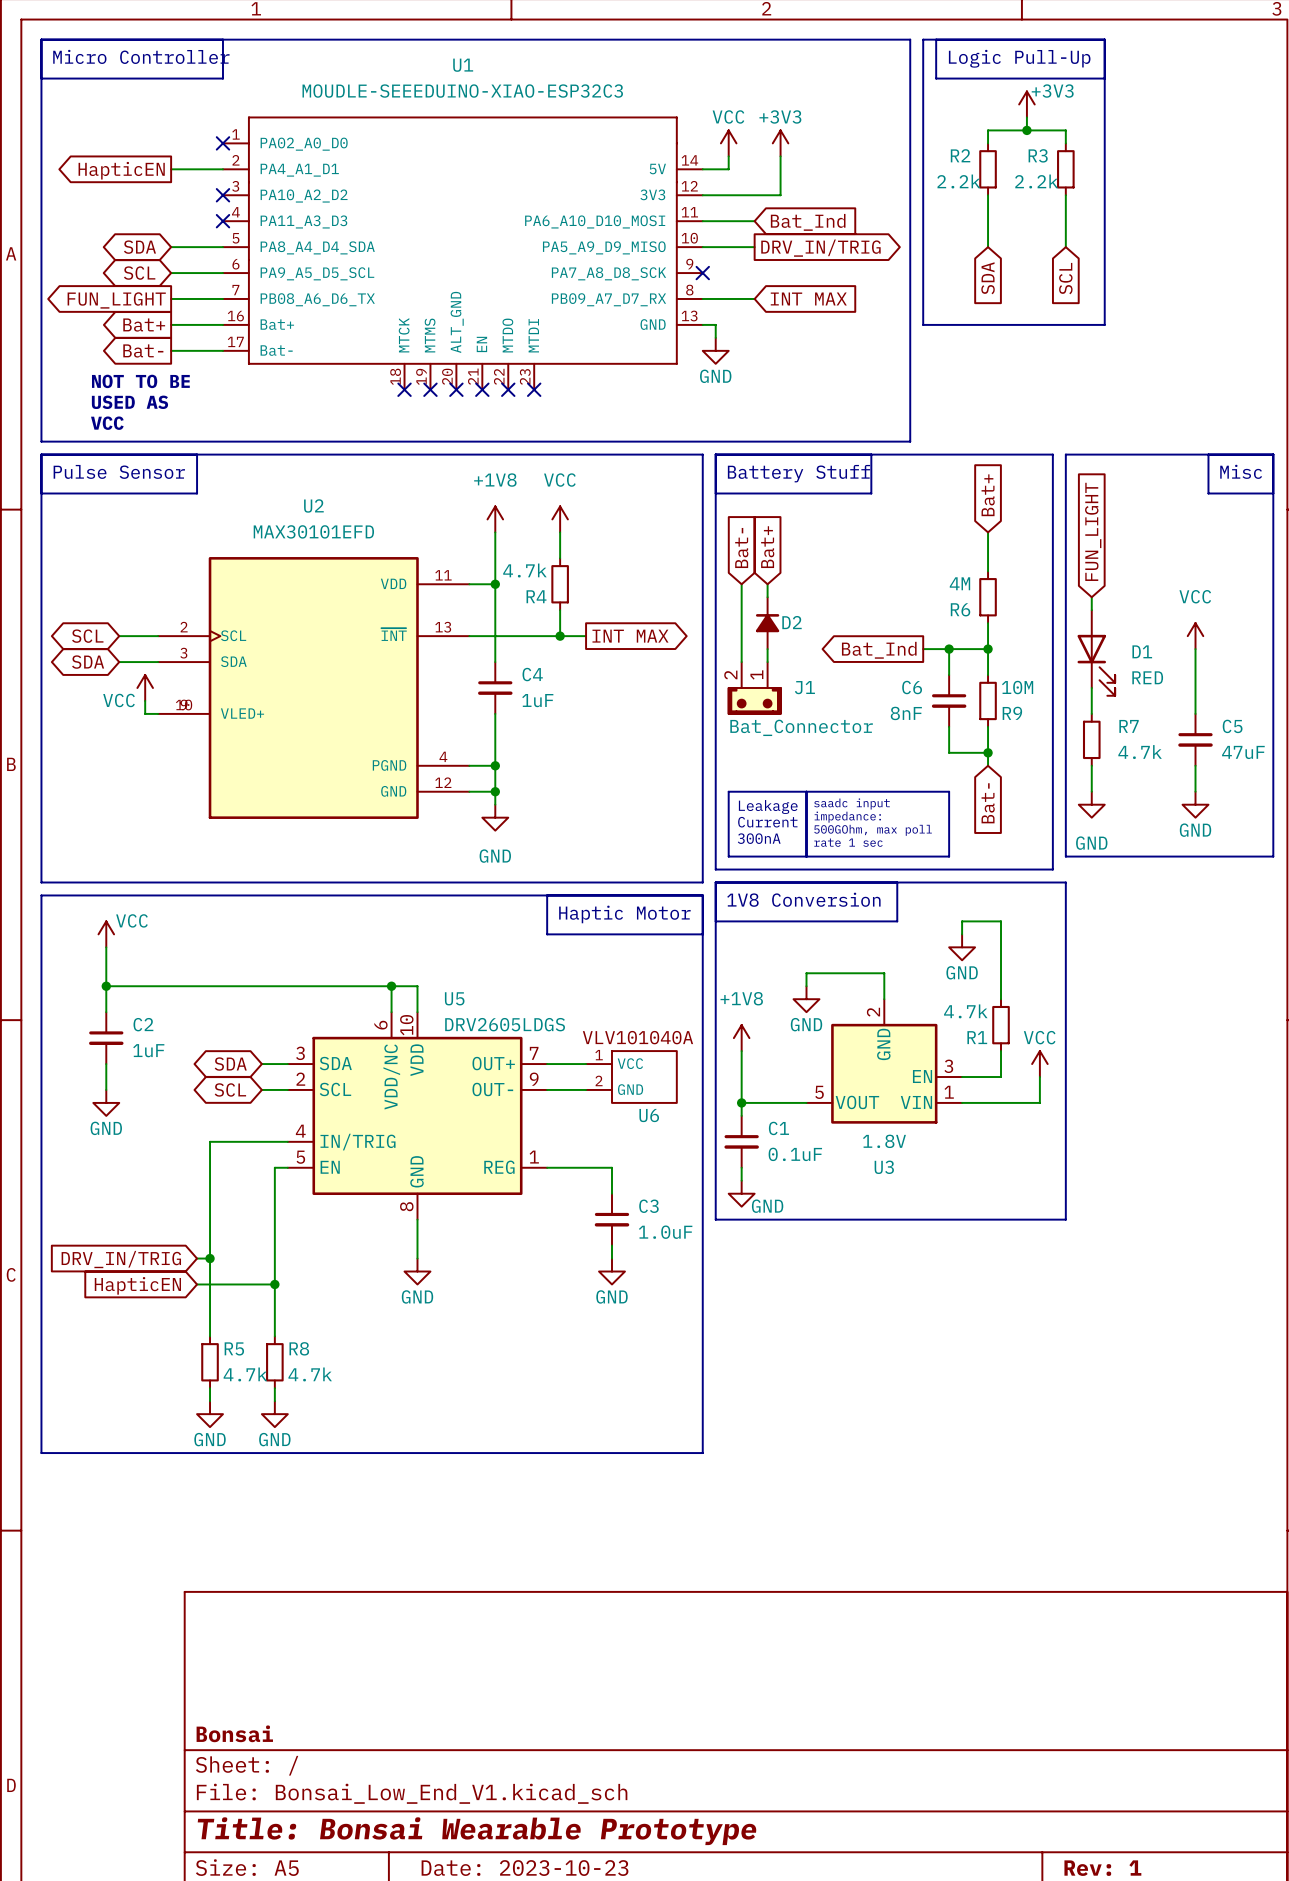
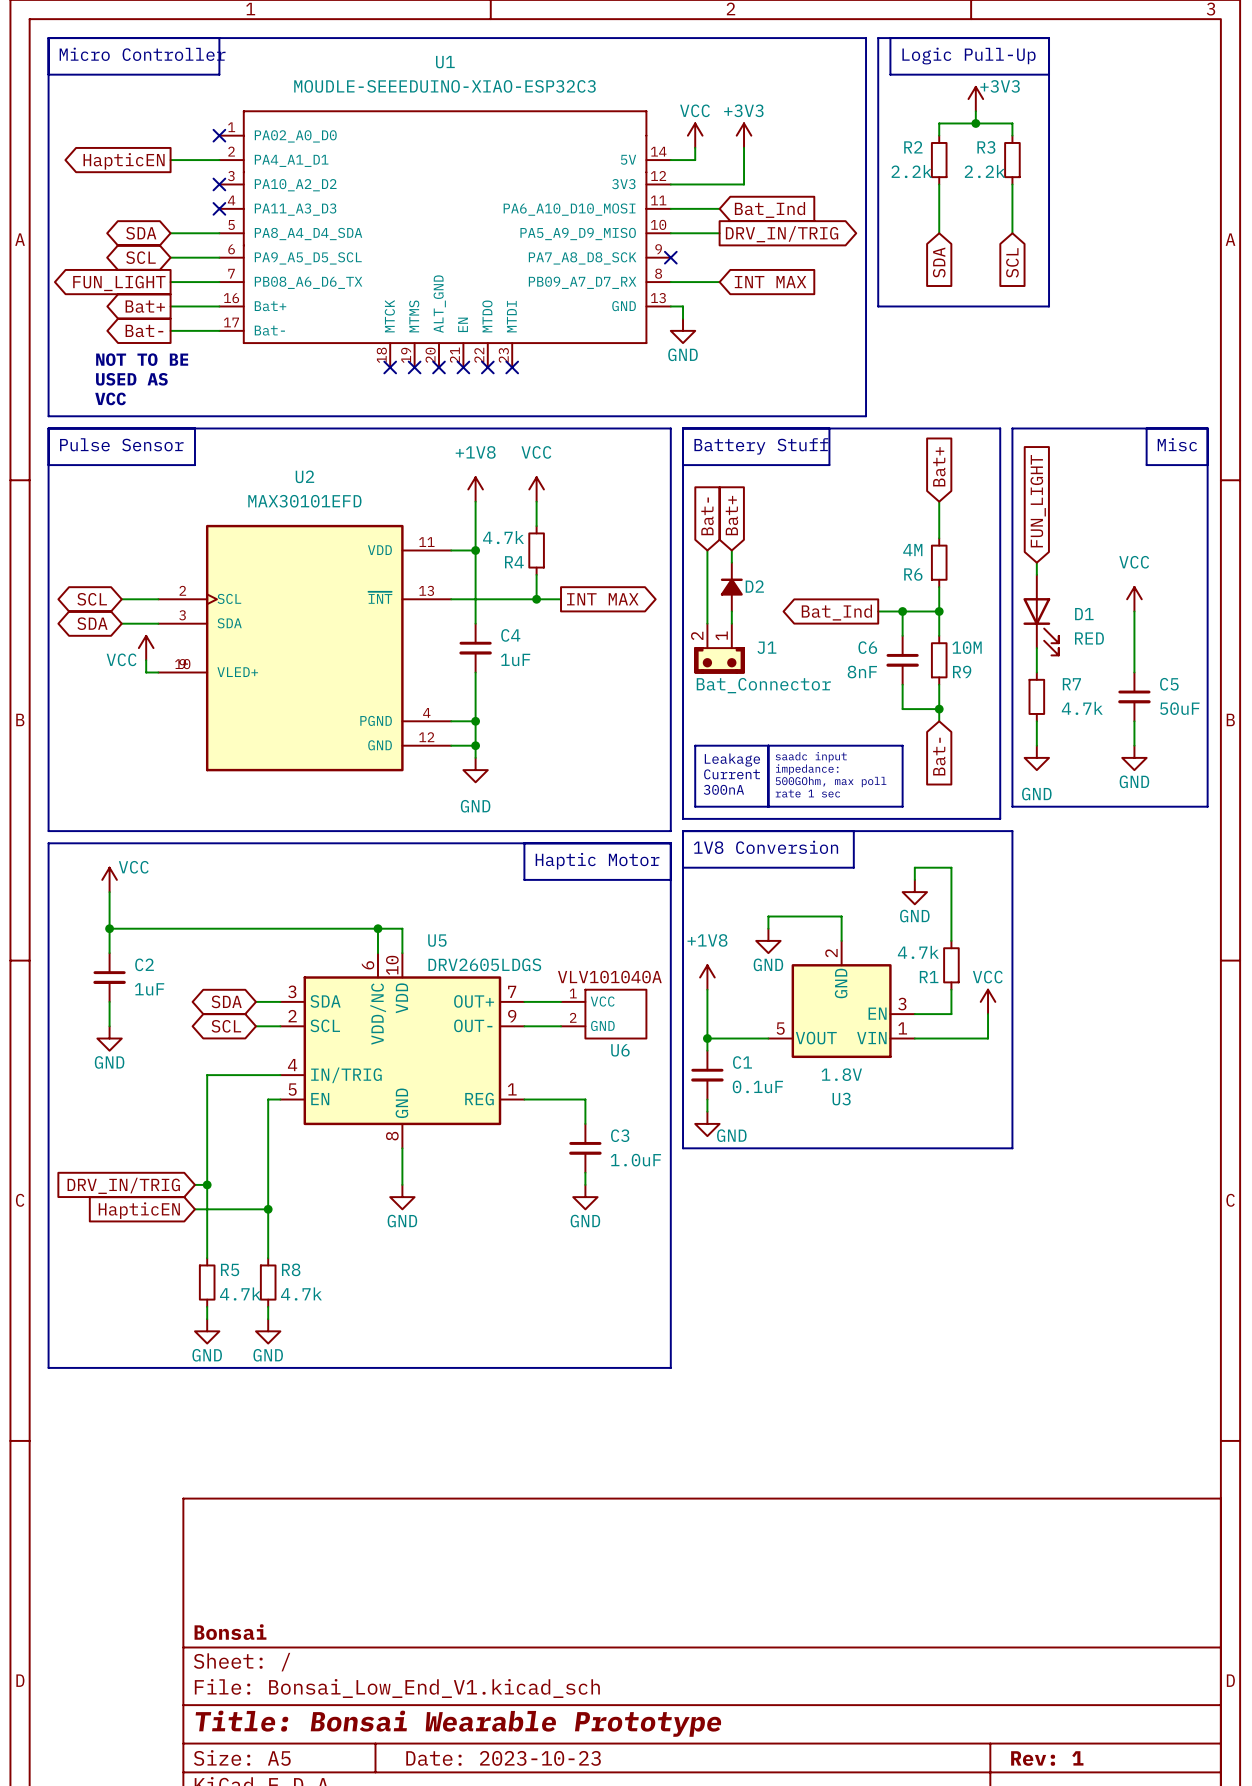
C5 value: 47uF (1243, 752) -> 50uF (1179, 708)

